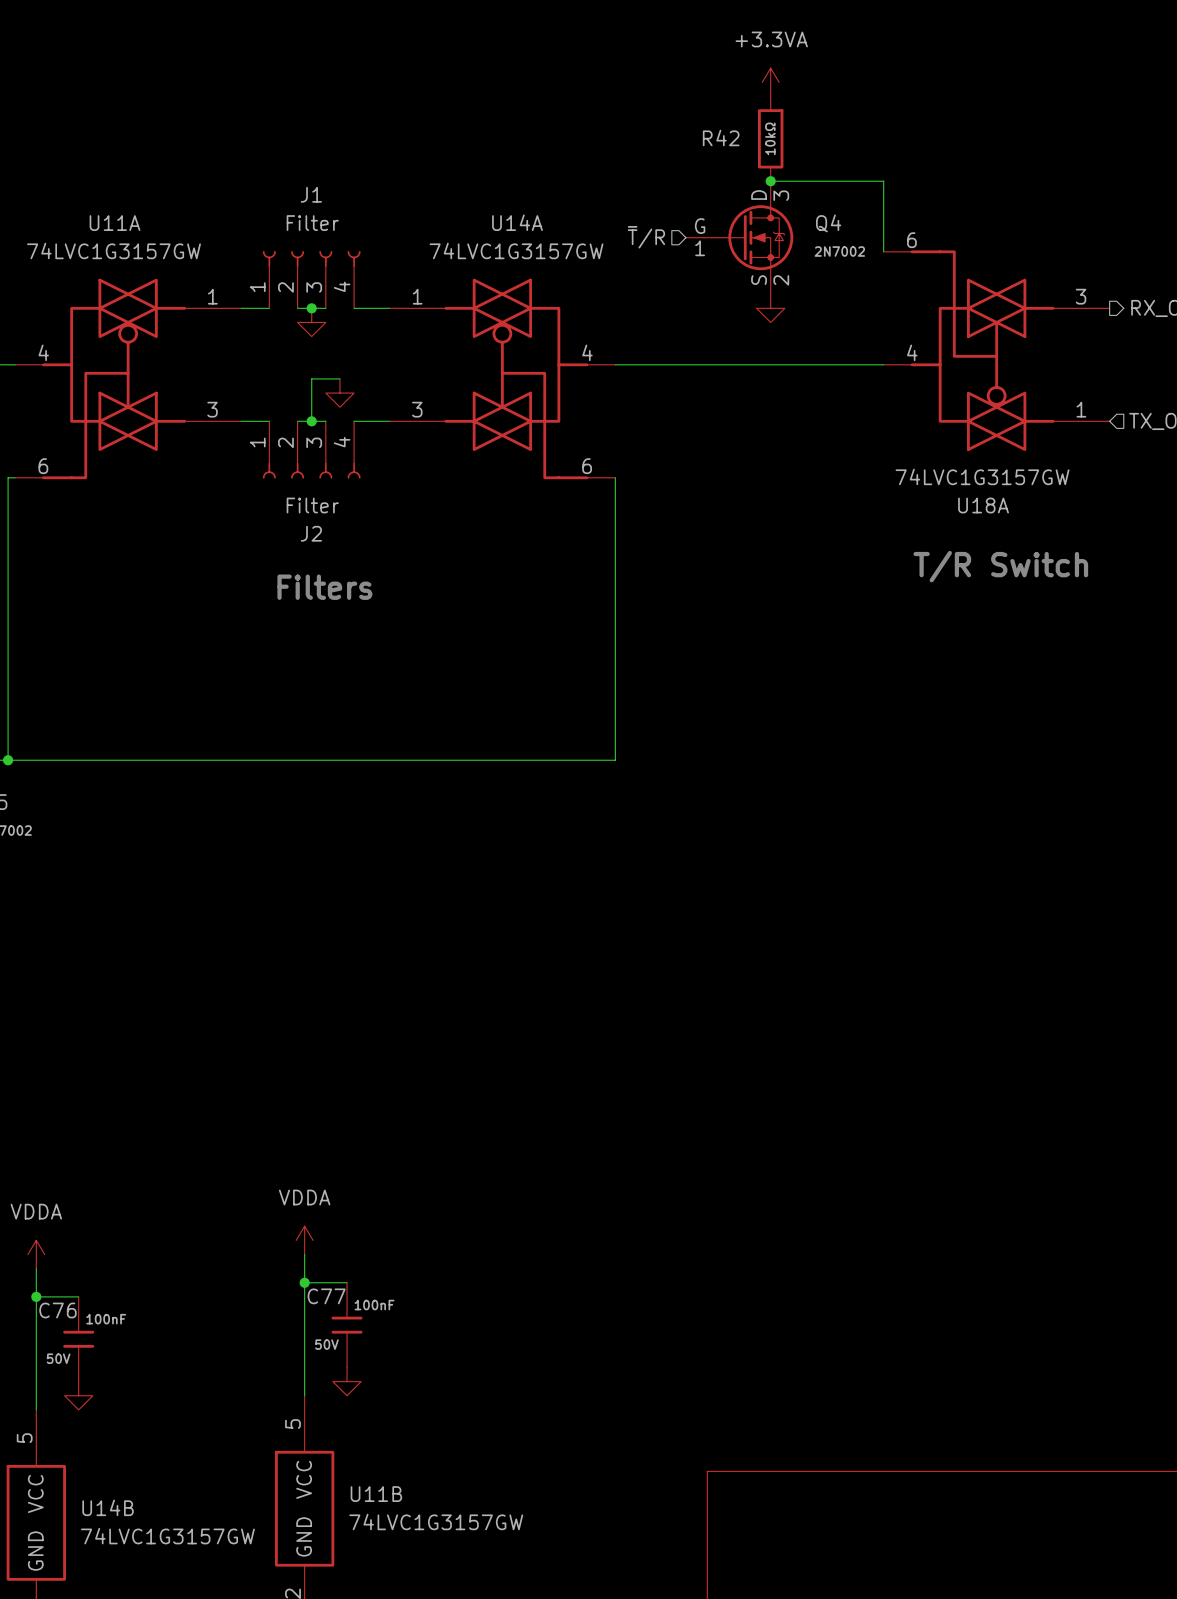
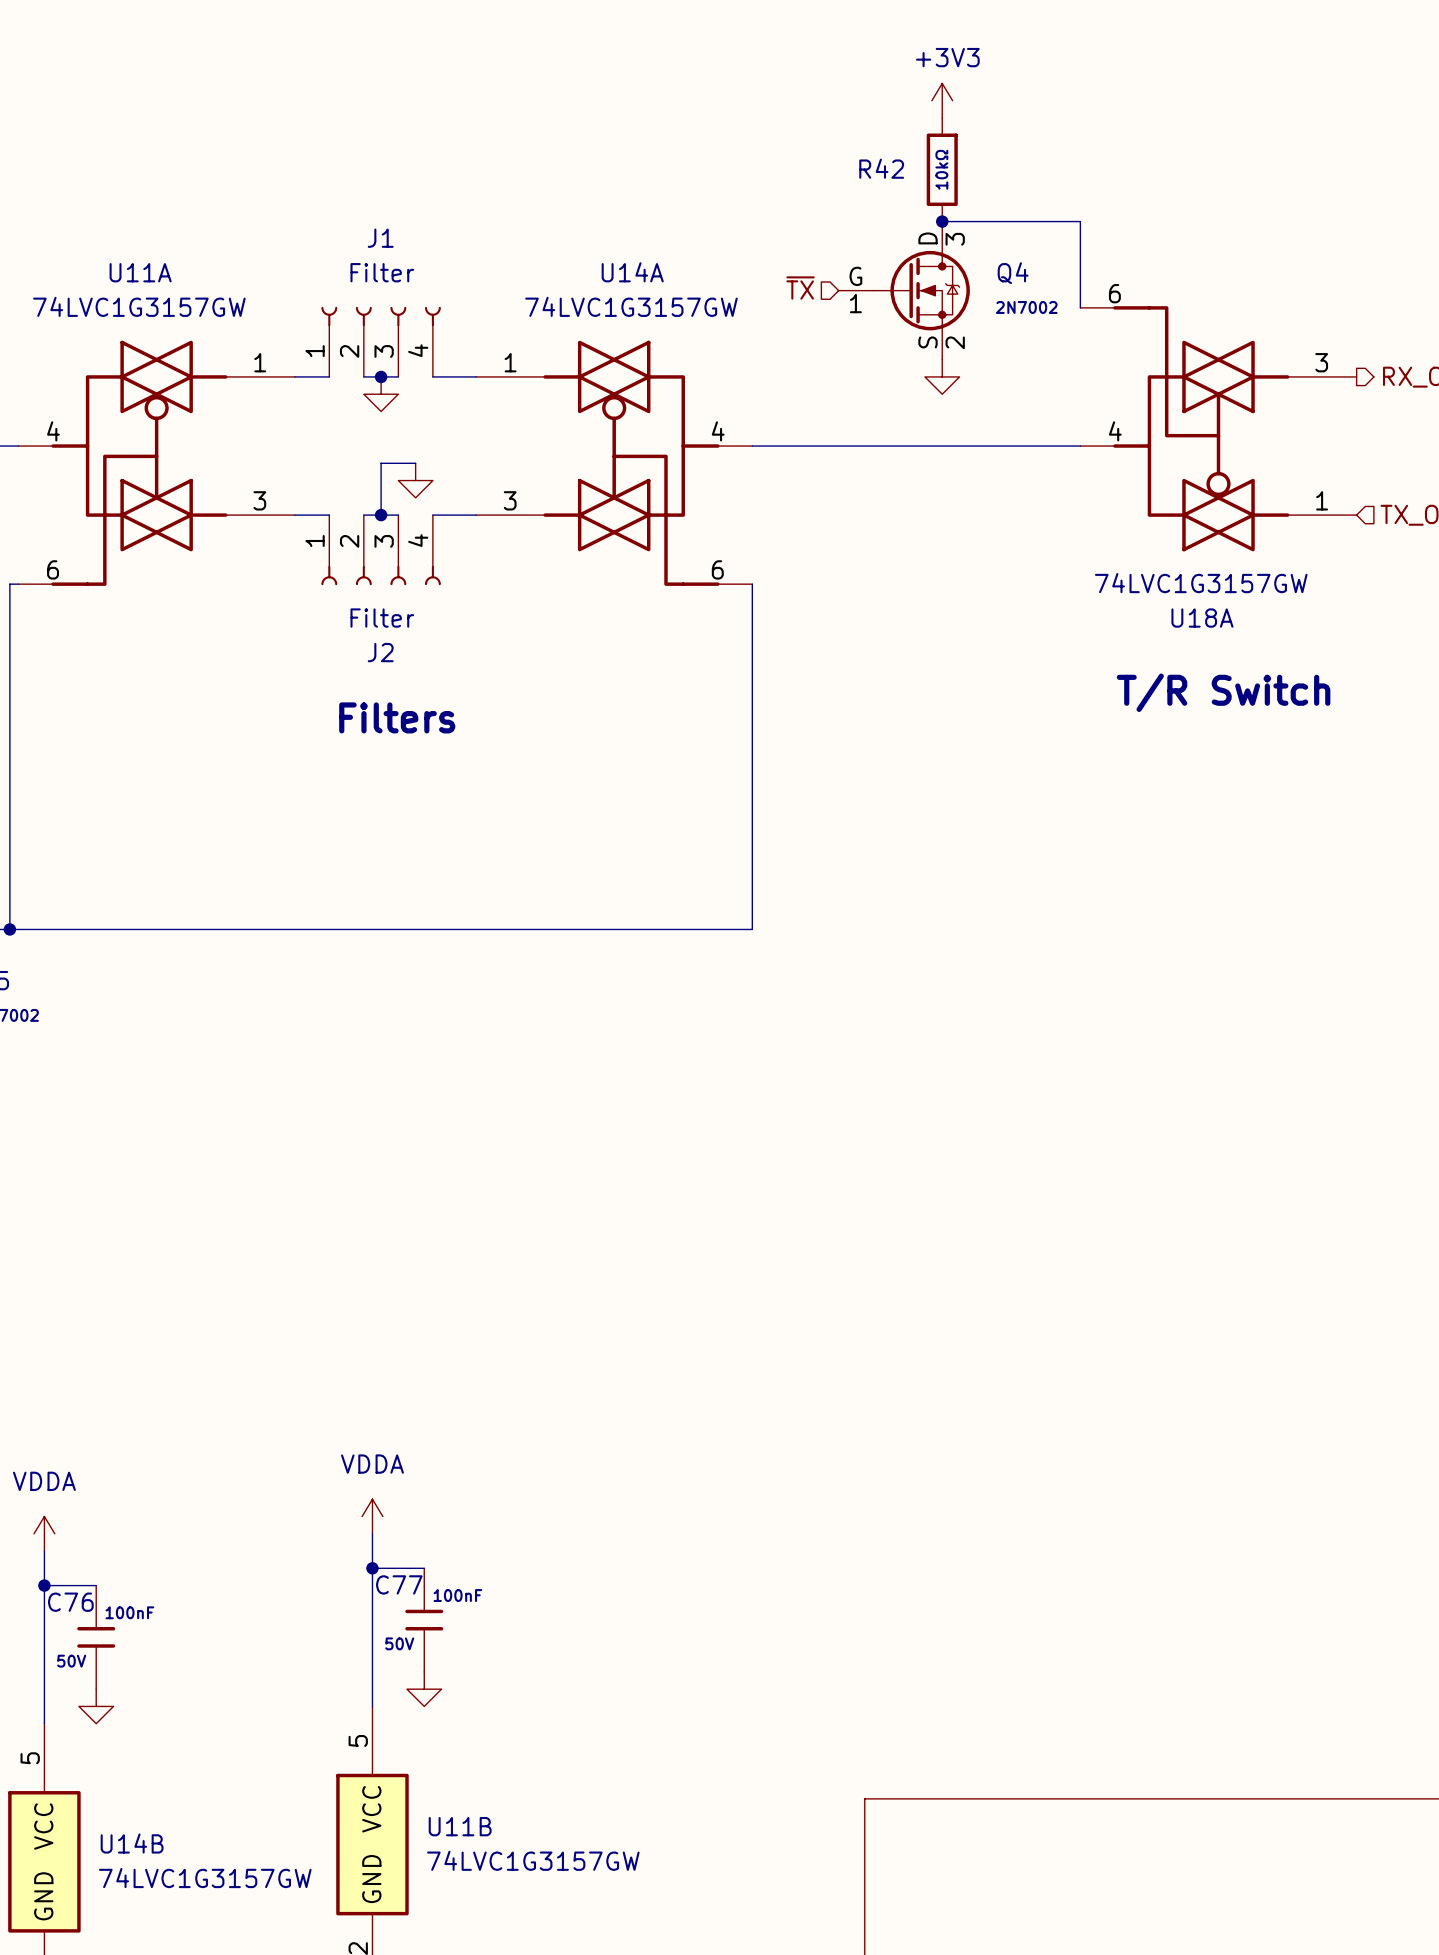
power symbol: +3.3VA (770, 82) -> +3V3 (942, 100)
hierarchical label: ~{T}/R (646, 237) -> ~{TX} (800, 288)

